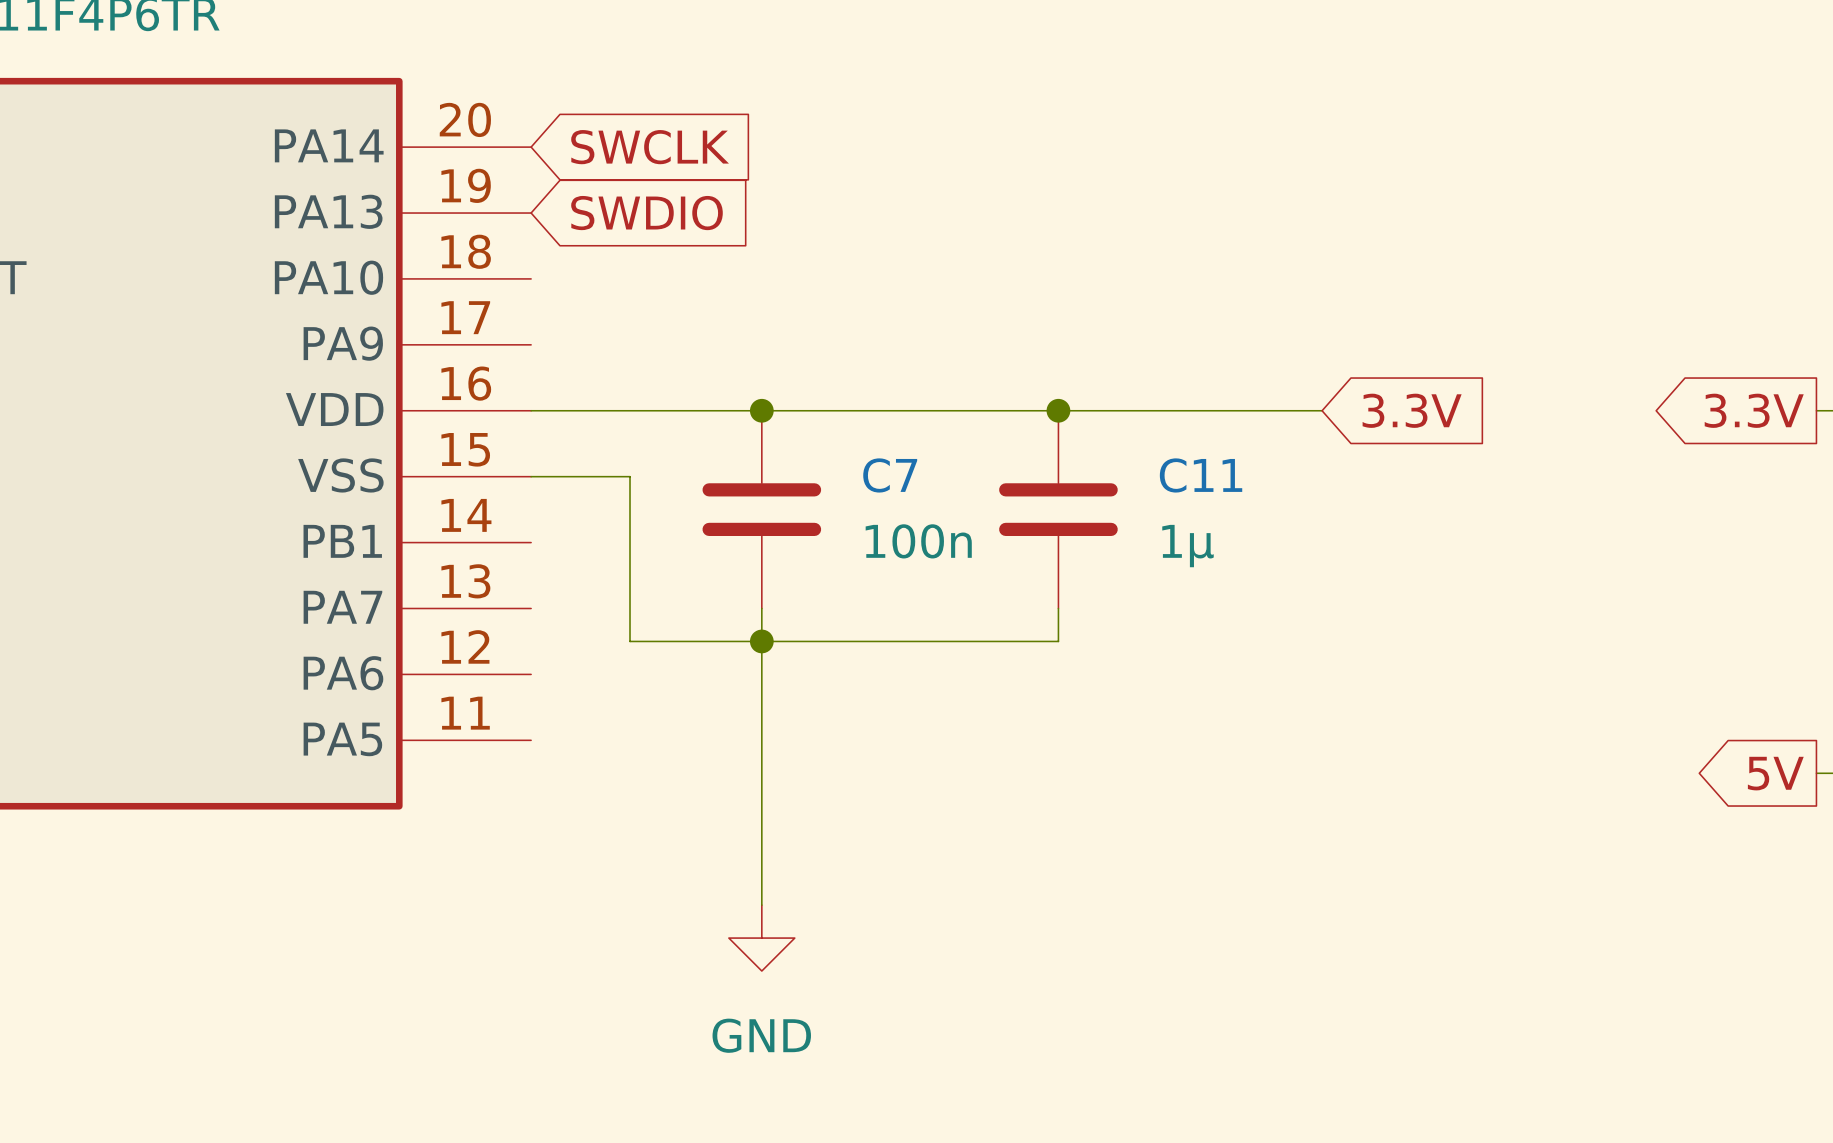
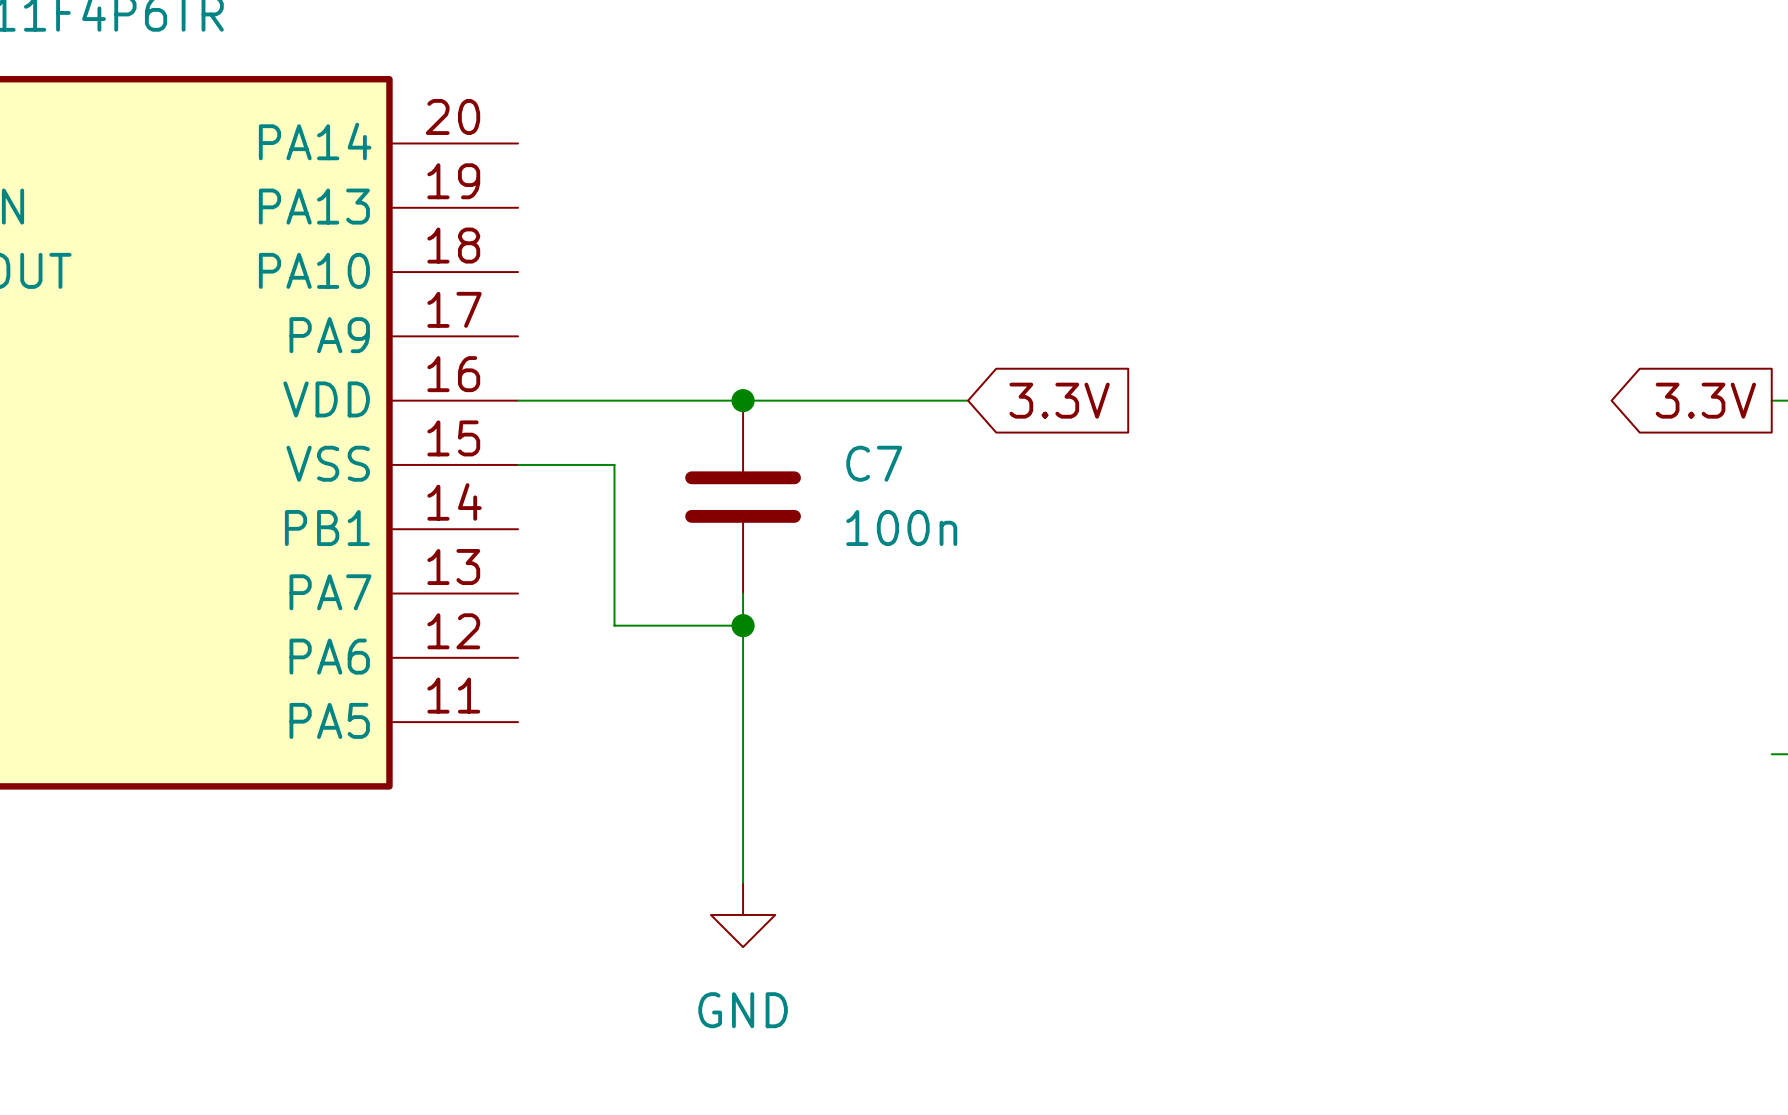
global label: SWCLK (650, 147) -> none
global label: SWDIO (646, 213) -> none
wire: (992, 410) (1322, 410) -> none
junction: (1058, 410) -> none
global label position: 3.3V (1412, 410) -> 3.3V (1059, 400)
C11: 1µ (1058, 509) -> none
wire: (1058, 608) (1058, 641) (761, 641) -> none
global label: 5V (1775, 773) -> none

